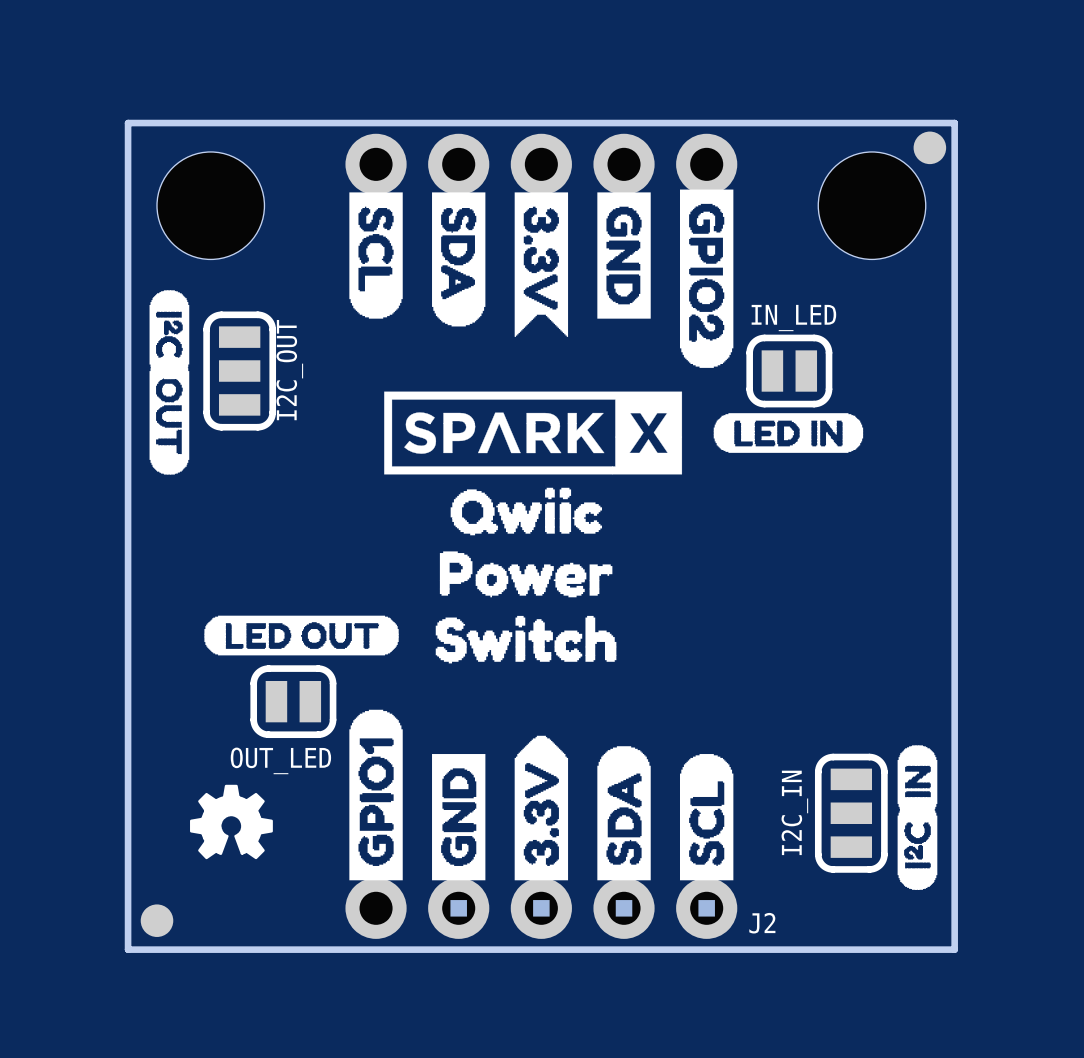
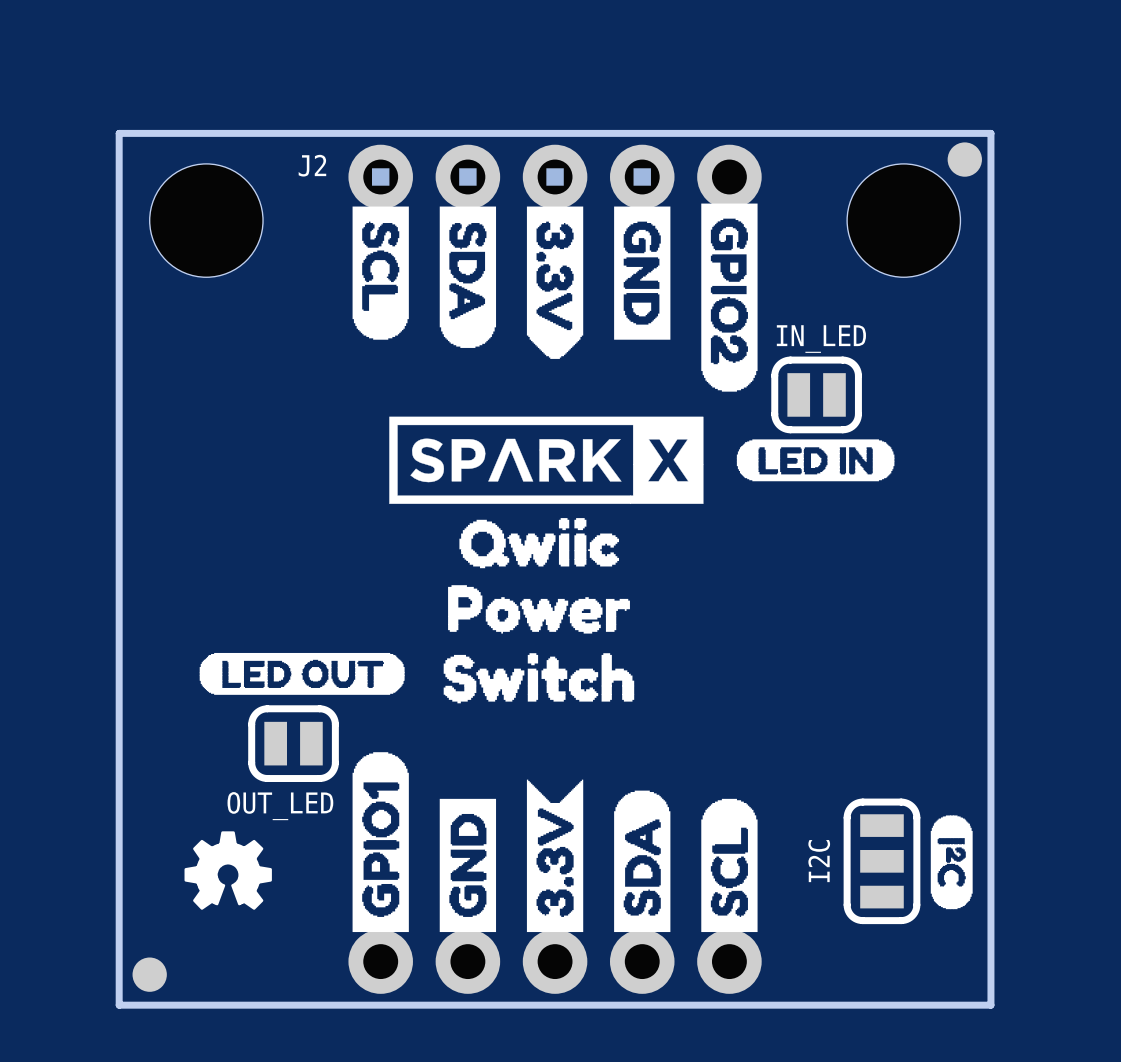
part position: (500, 164) -> (598, 961)
drawing shape: [514, 192, 569, 337] -> [526, 206, 584, 359]
drawing: [149, 290, 190, 475] -> none
I2C_OUT: (239, 371) -> none
drawing shape: [514, 735, 569, 881] -> [526, 779, 584, 933]
drawing: [897, 745, 938, 890] -> none
drawing: none -> [930, 815, 973, 910]
I2C_IN name: I2C_IN (794, 812) -> I2C (819, 861)
J2 position: (582, 908) -> (511, 176)
J2 name position: J2 (762, 923) -> J2 (312, 165)

